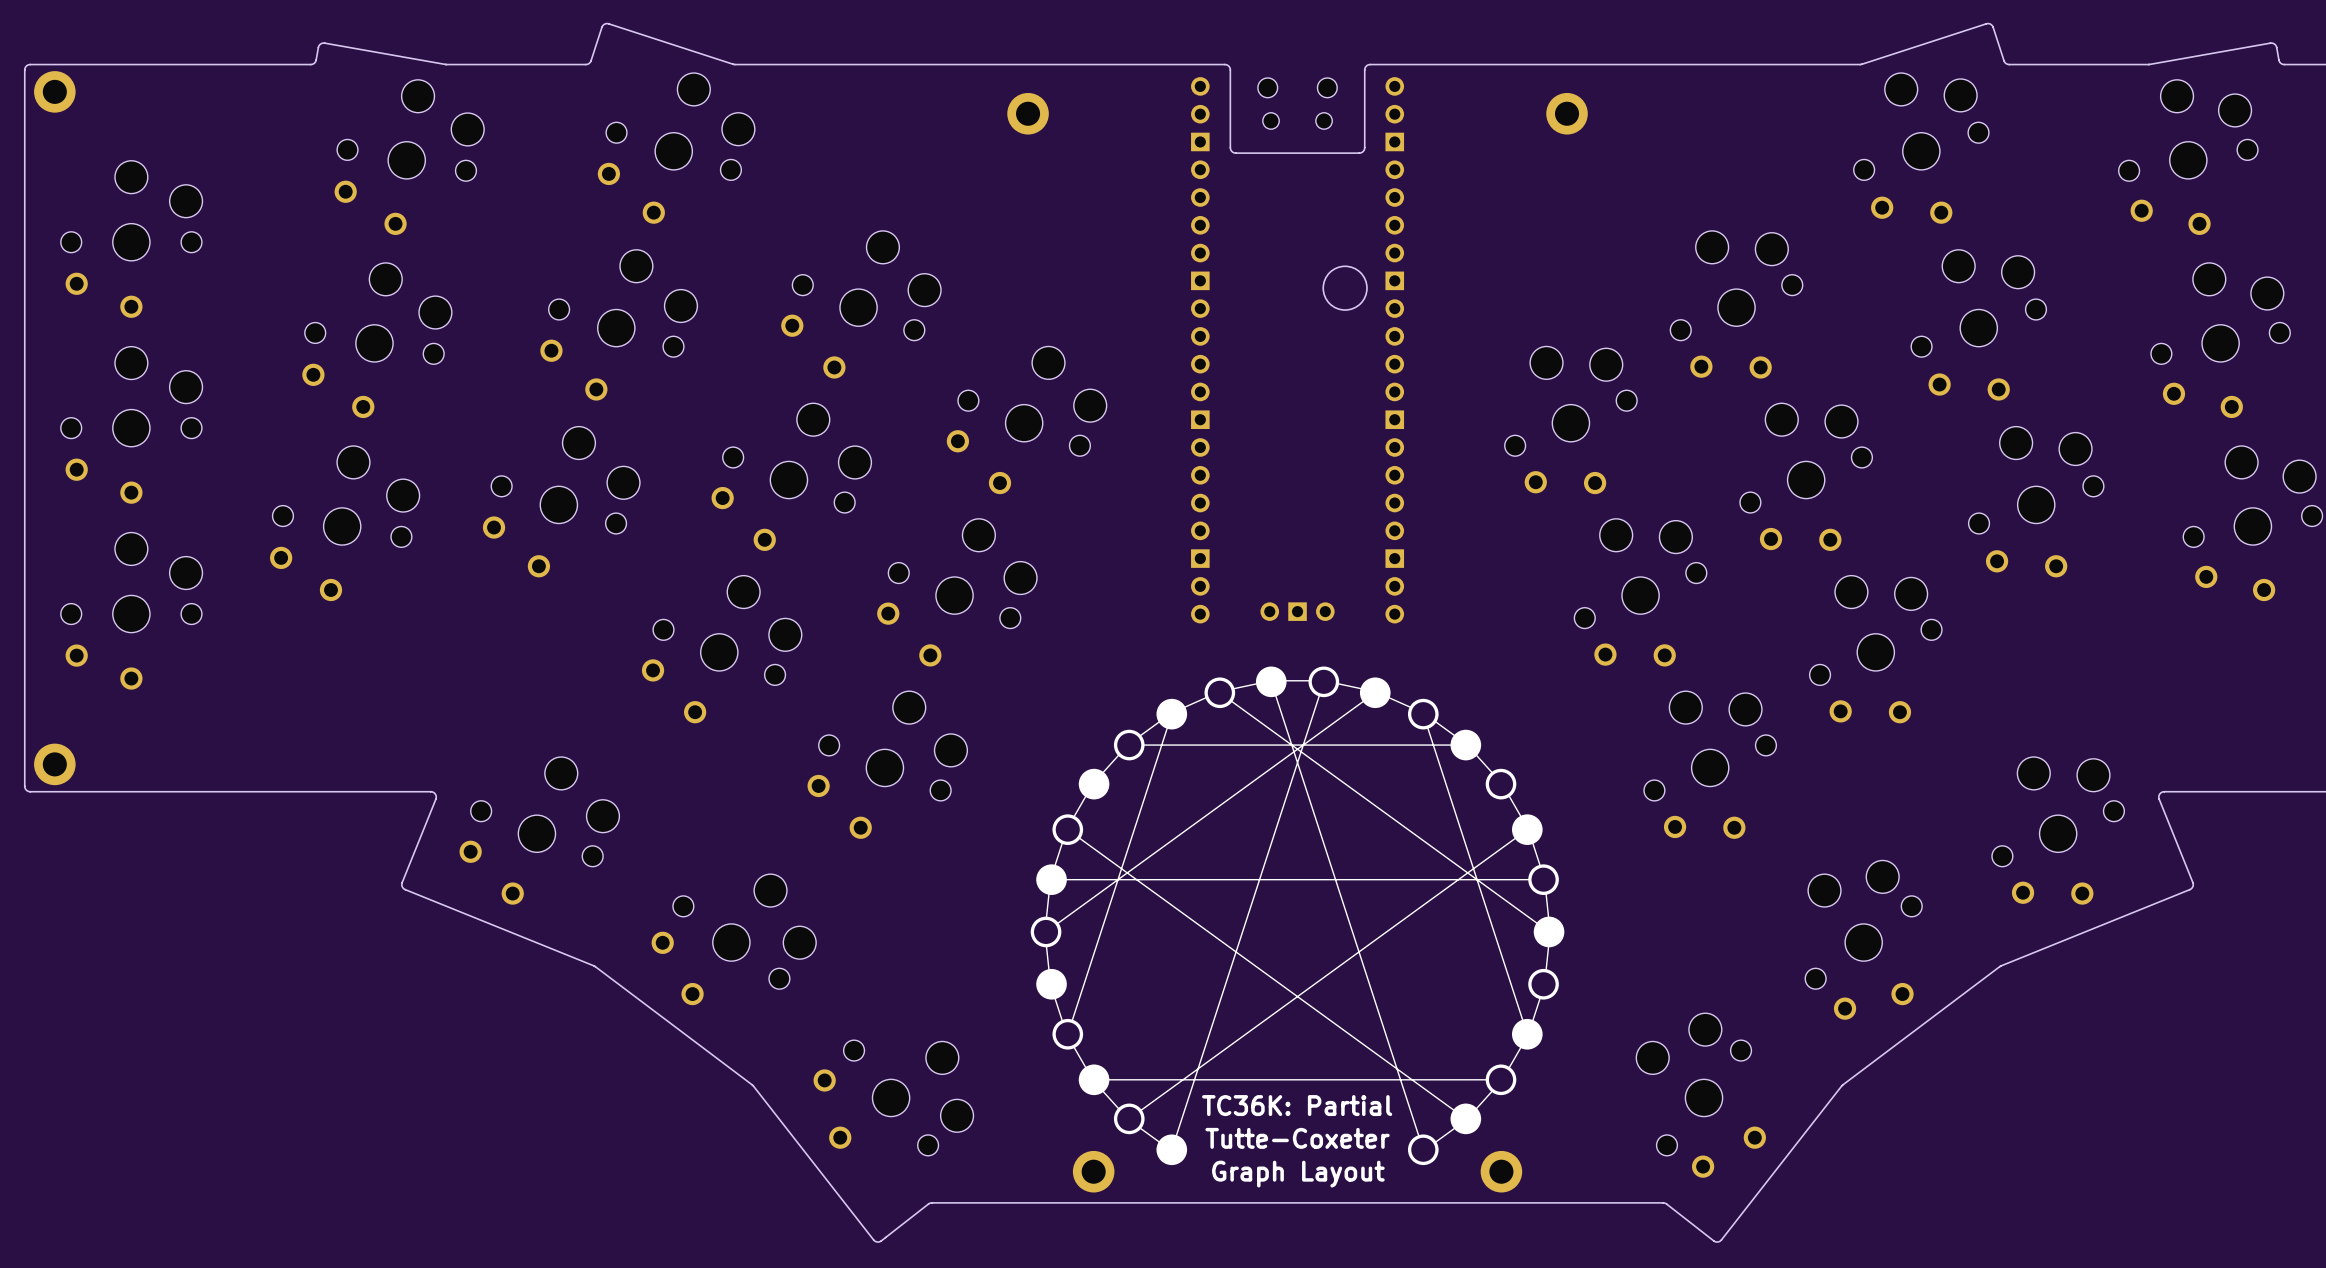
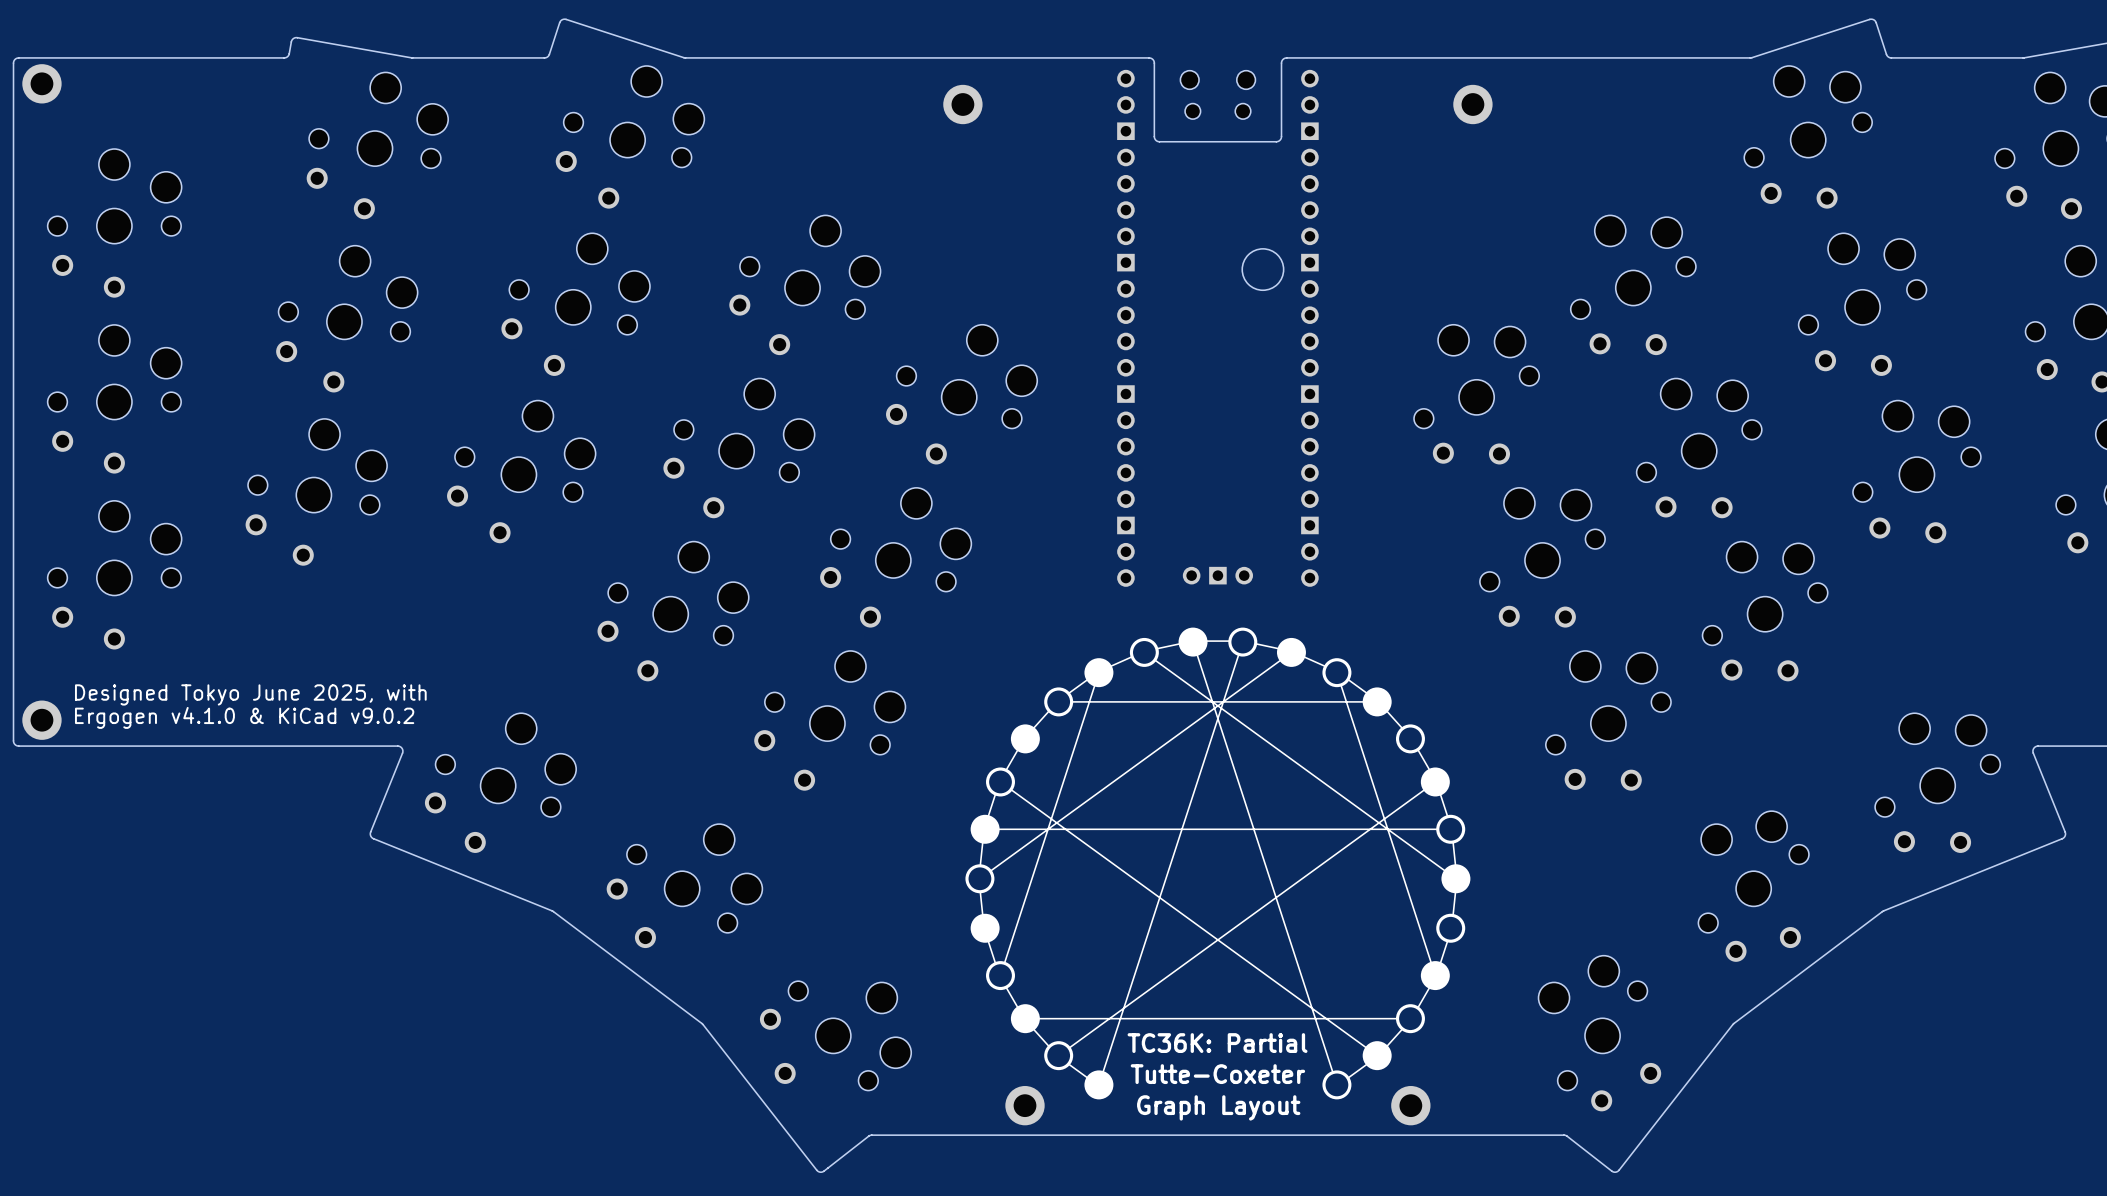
text: none -> Designed Tokyo June 2025, with (250, 694)
text: none -> Ergogen v4.1.0 & KiCad v9.0.2 (244, 717)

